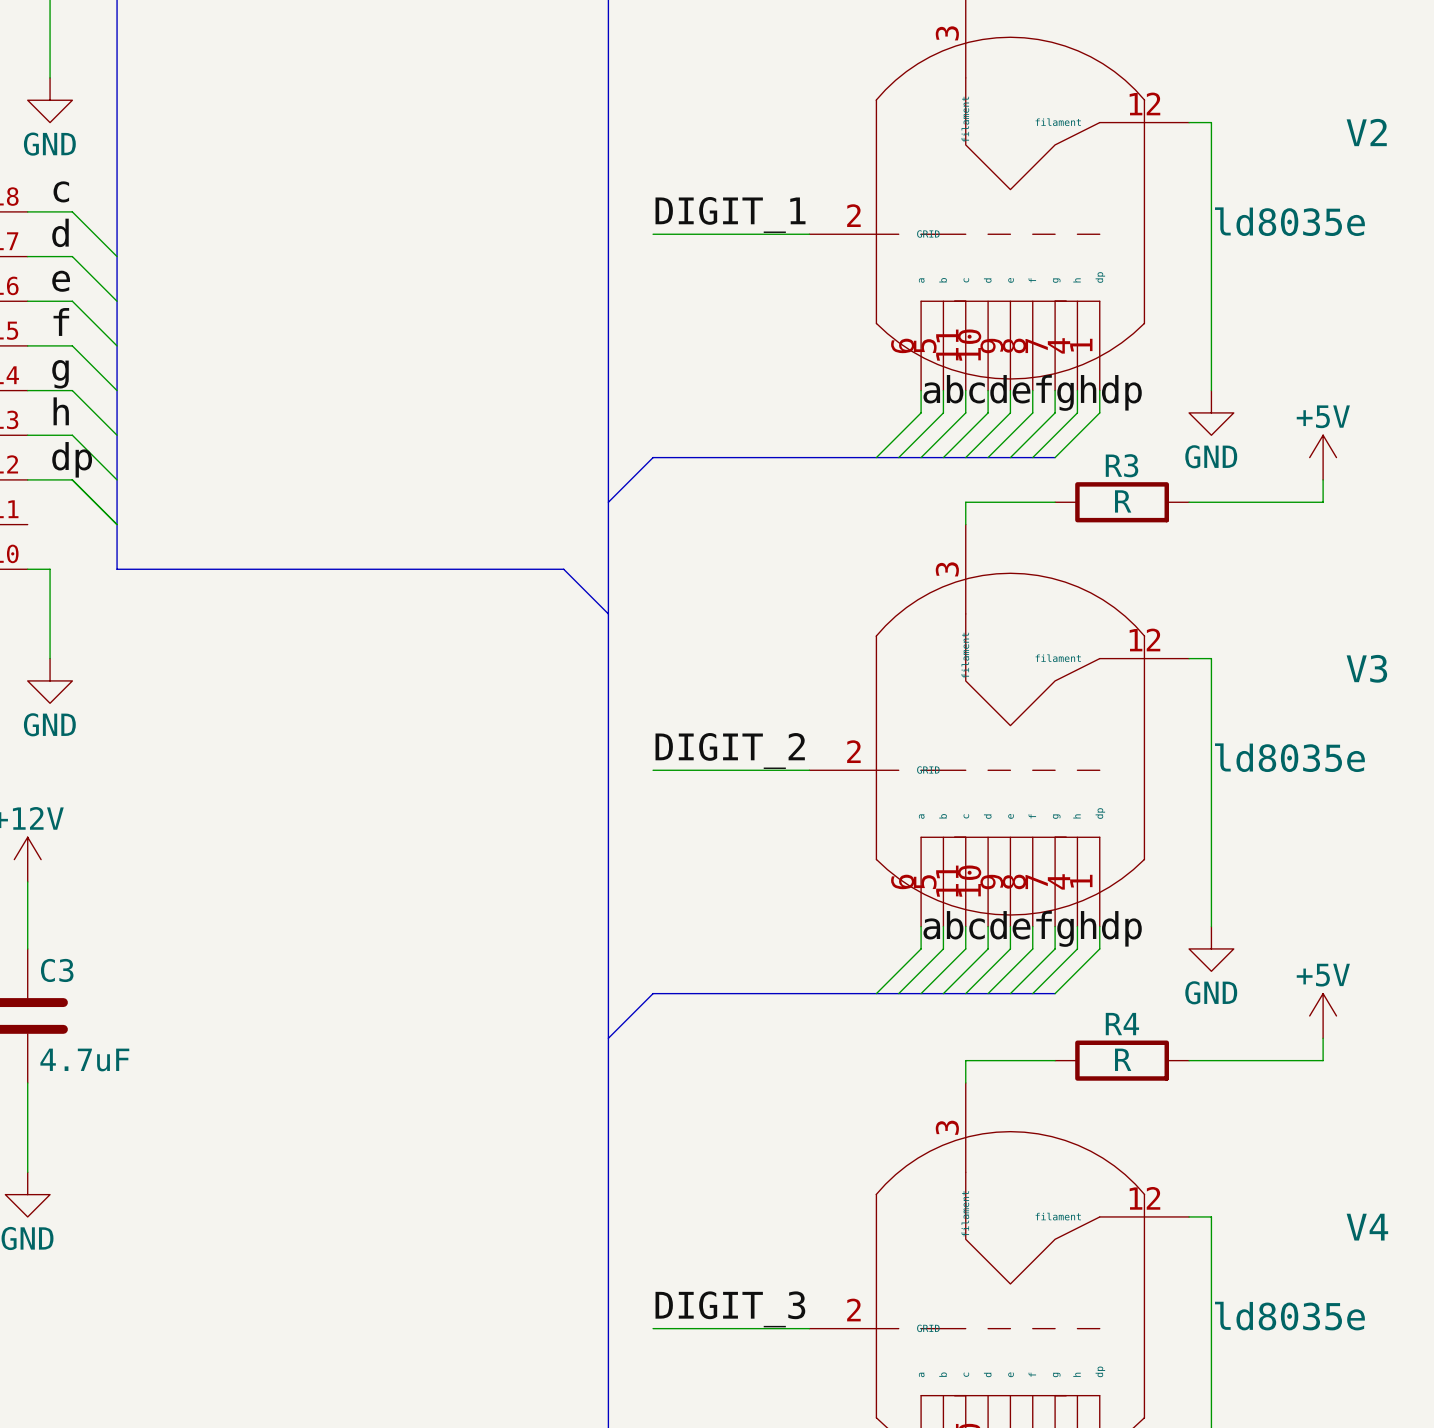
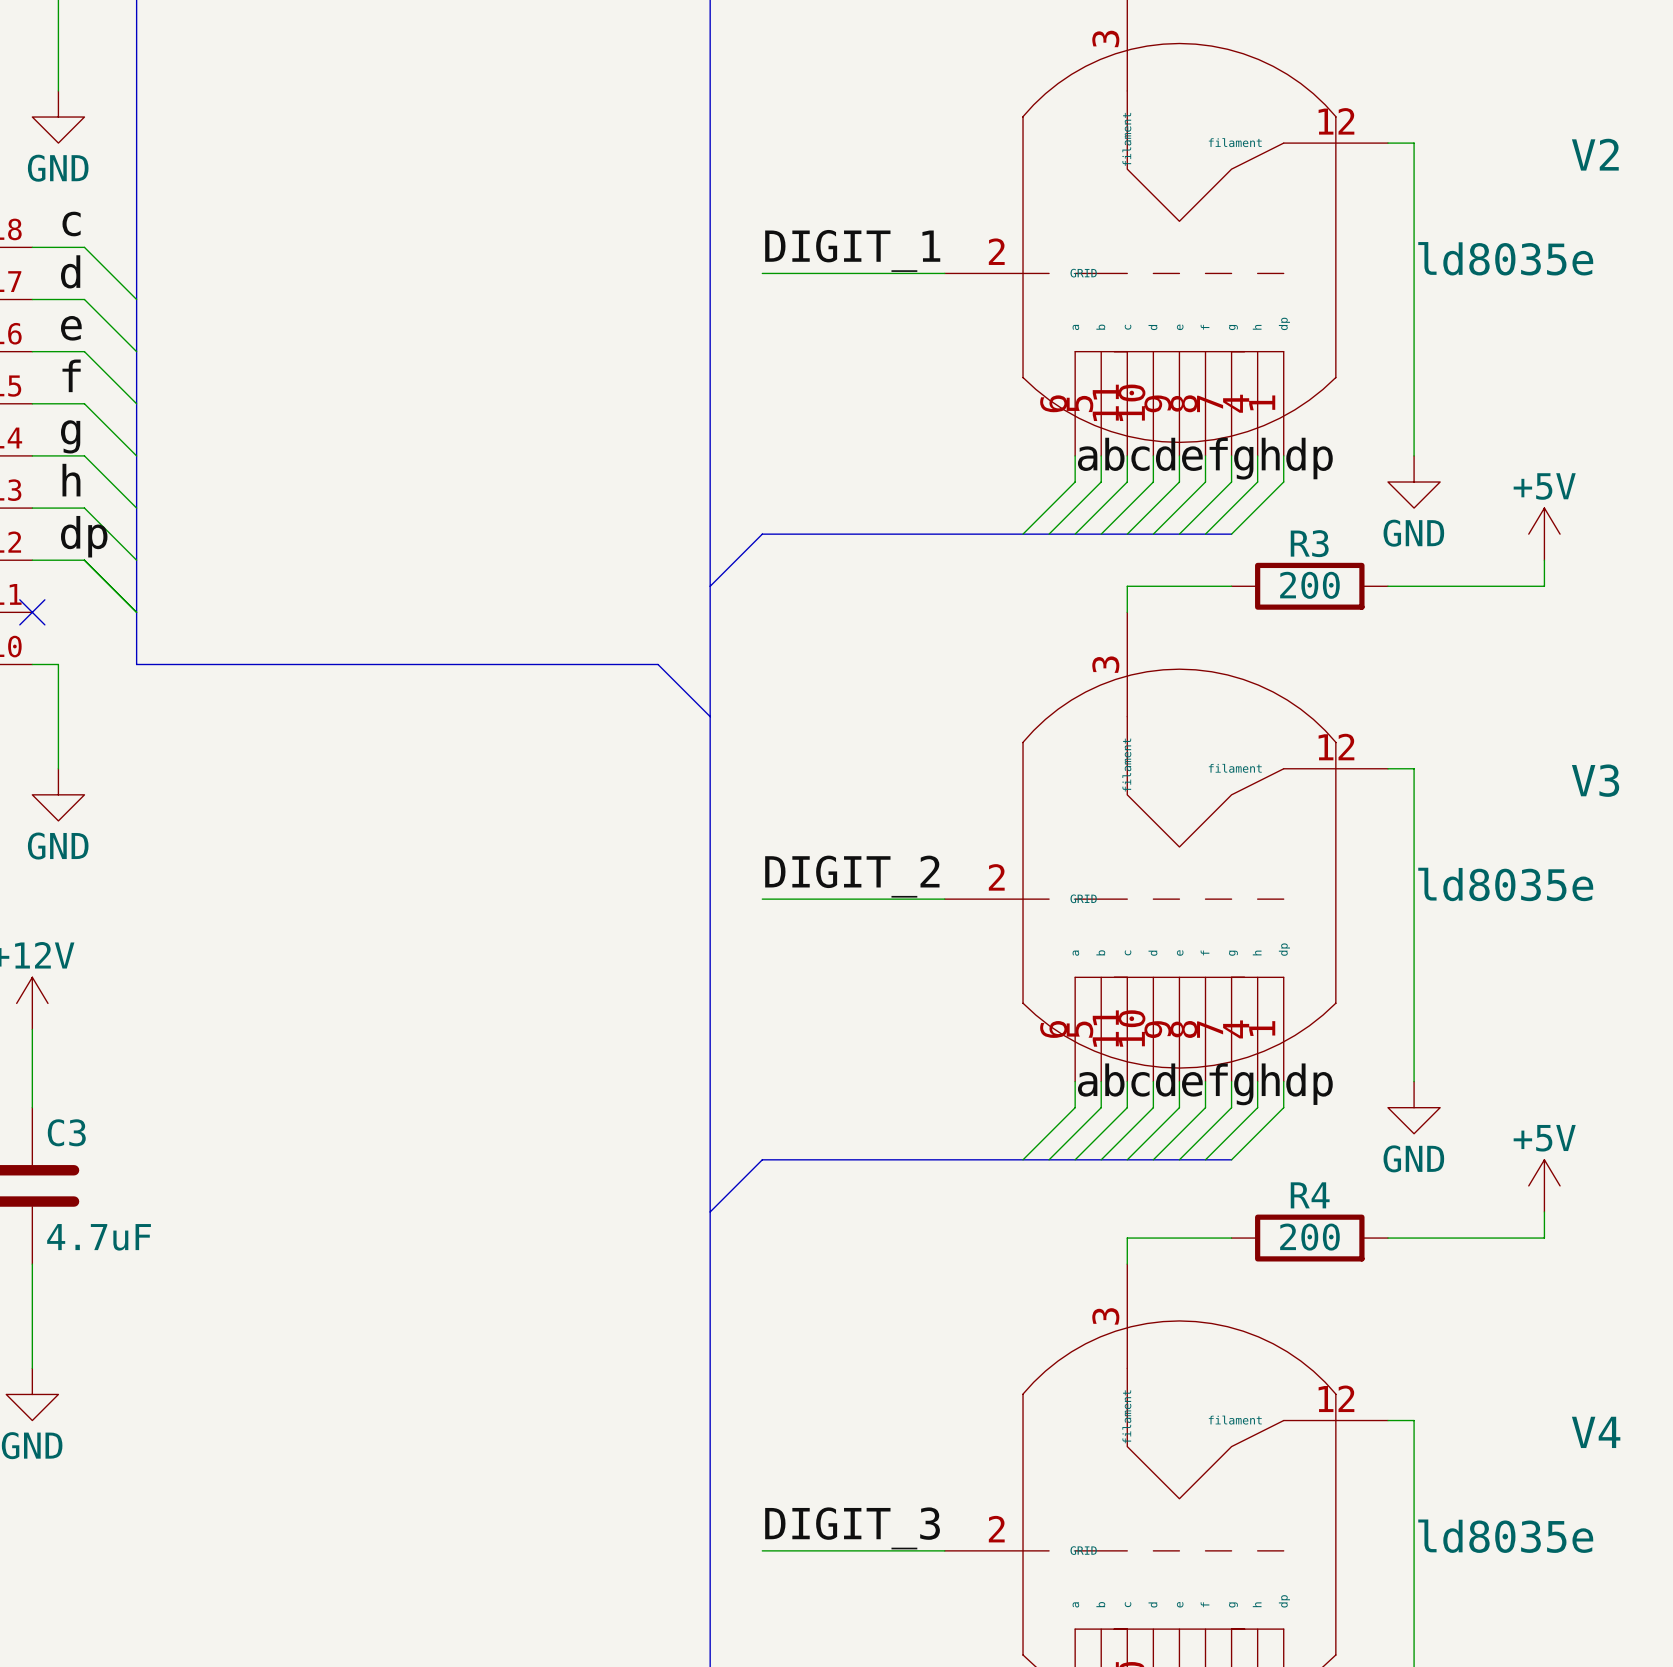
R3 value: R (1123, 501) -> 200 (1309, 585)
no-connect mark: none -> (32, 612)
R4 value: R (1123, 1059) -> 200 (1309, 1237)

